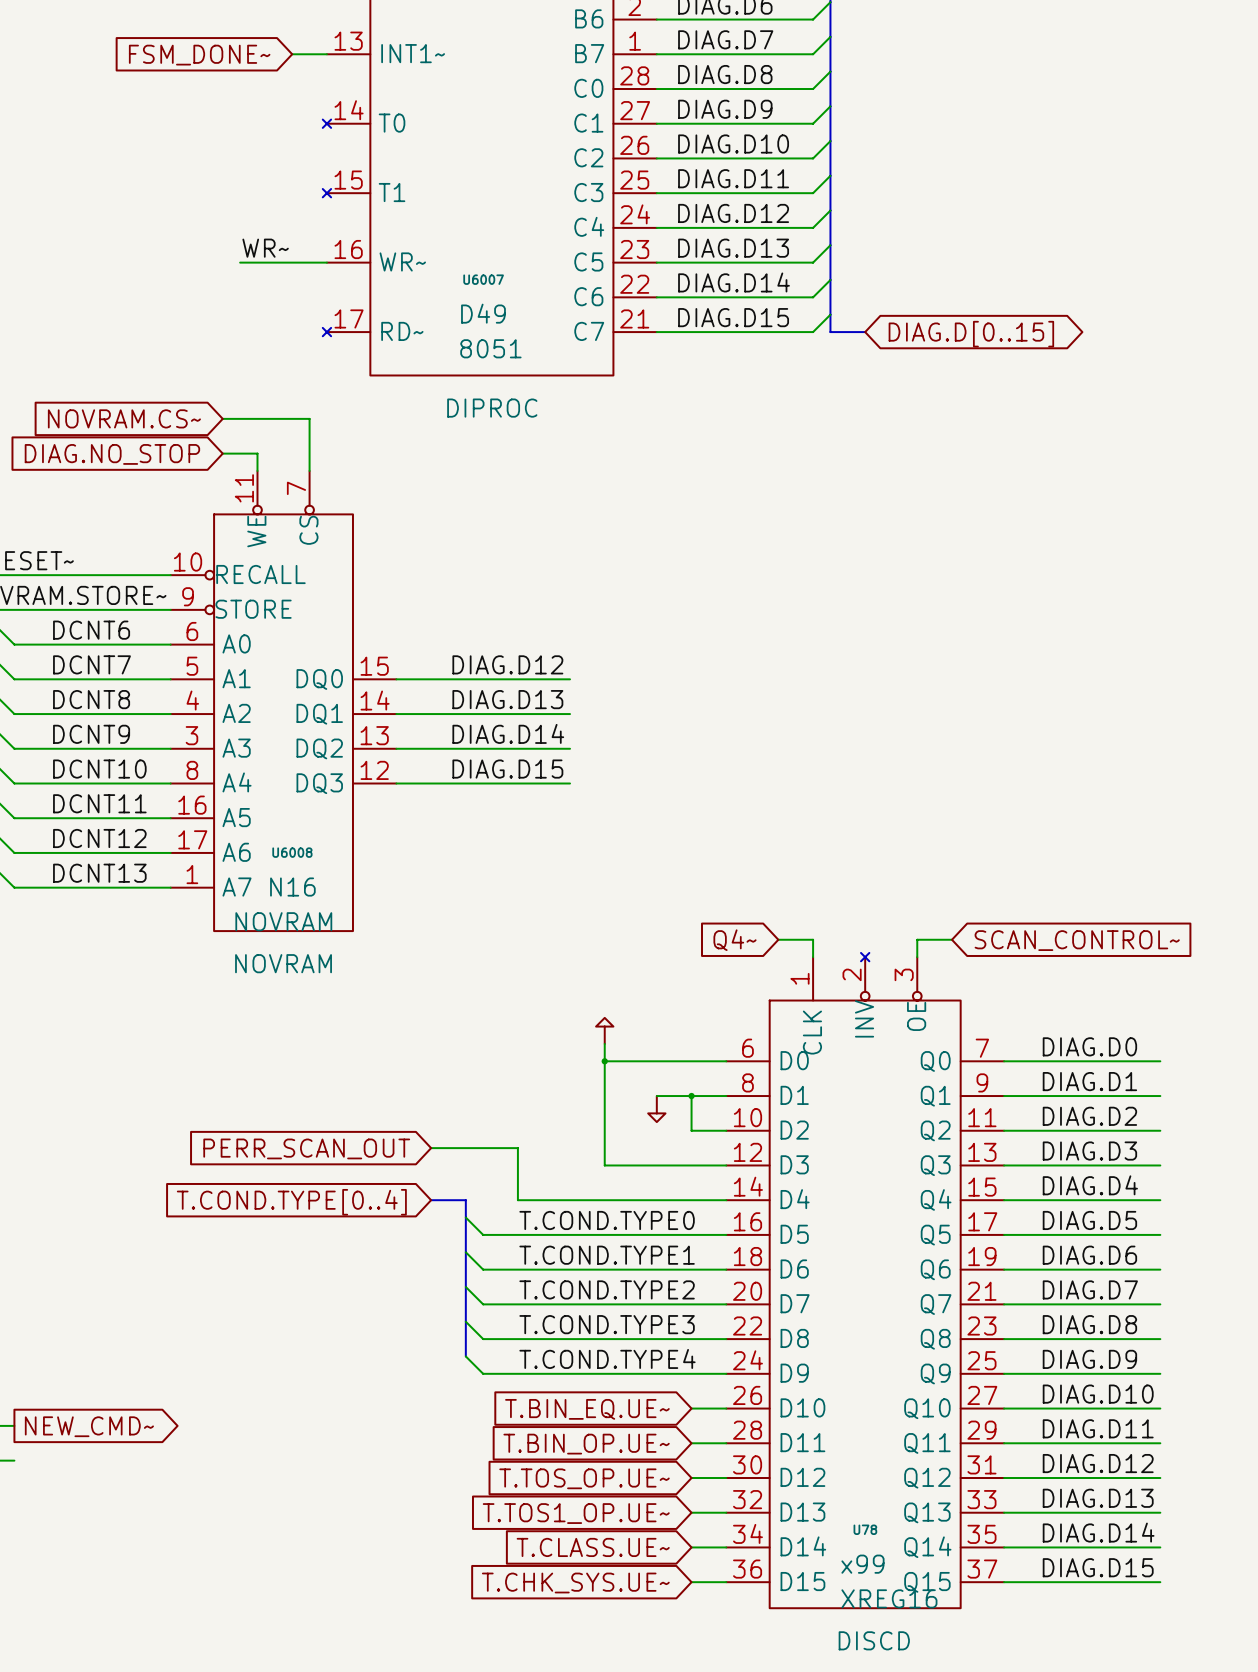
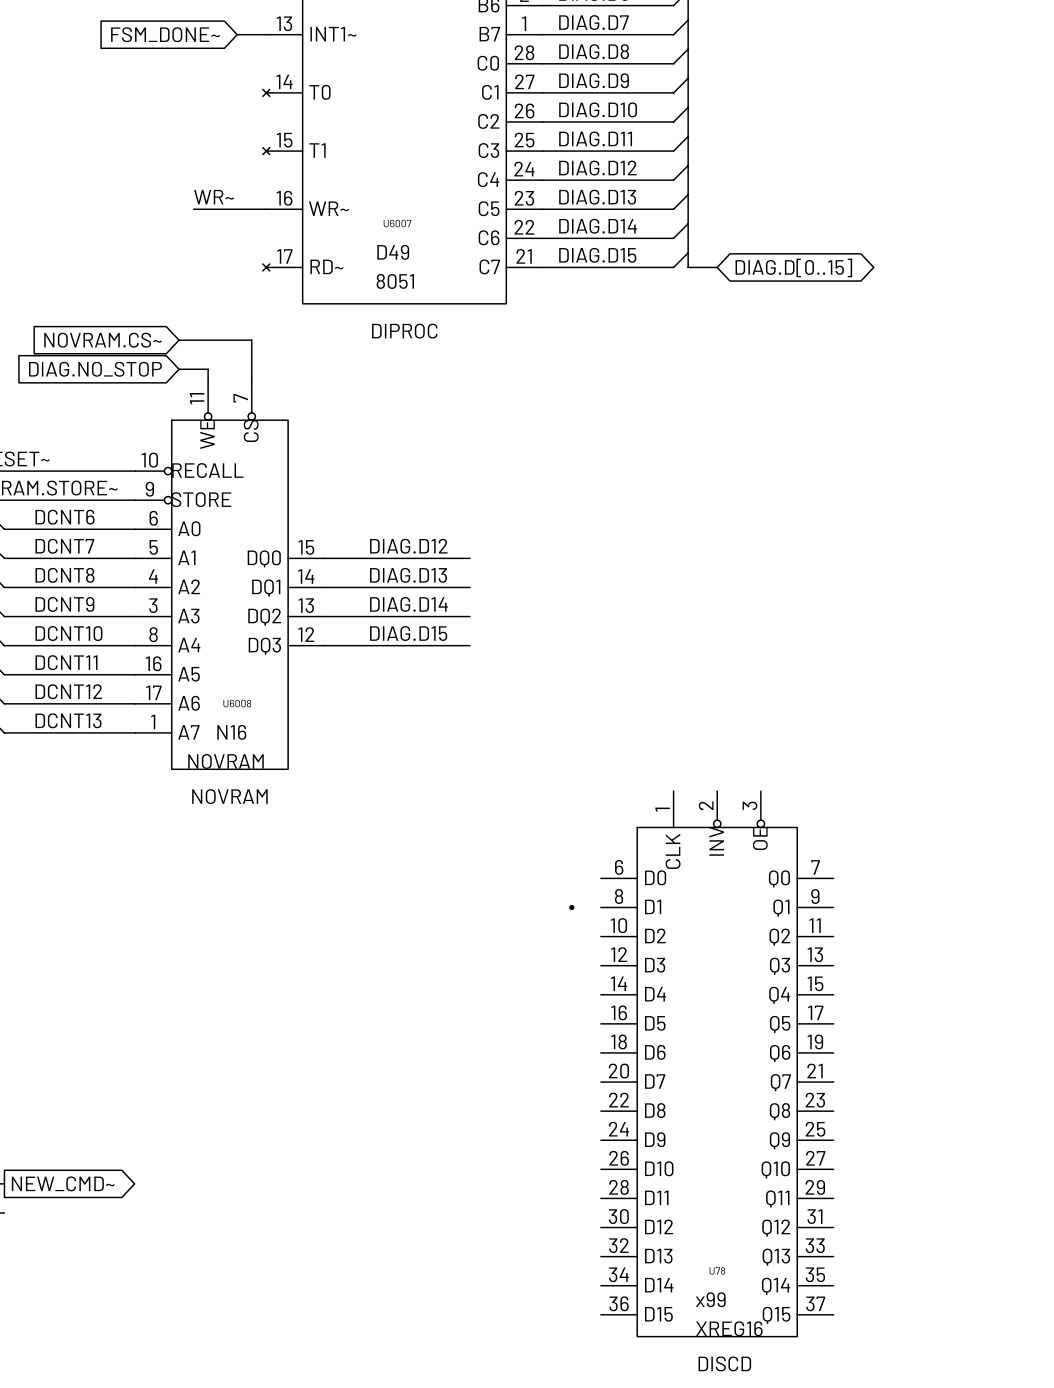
wire: (778, 939) (813, 939) (813, 957) -> none
wire: (951, 939) (917, 939) (917, 957) -> none
global label: Q4~ (734, 940) -> none
global label: SCAN_CONTROL~ (1077, 940) -> none
no-connect mark: (865, 957) -> none
power symbol: (604, 1030) -> none
wire: (604, 1043) (604, 1165) (726, 1165) -> none
label: DIAG.D0 (1089, 1046) -> none
wire: (604, 1061) (726, 1061) -> none
junction: (604, 1061) -> none
wire: (1004, 1061) (1160, 1061) -> none
label: DIAG.D1 (1089, 1081) -> none
wire: (656, 1096) (726, 1096) -> none
wire: (691, 1096) (691, 1130) (726, 1130) -> none
wire: (1004, 1096) (1160, 1096) -> none
power symbol: (656, 1109) -> none
label: DIAG.D2 (1089, 1116) -> none
wire: (1004, 1130) (1160, 1130) -> none
global label: PERR_SCAN_OUT (306, 1148) -> none
wire: (431, 1148) (517, 1148) (517, 1200) (726, 1200) -> none
label: DIAG.D3 (1089, 1151) -> none
wire: (1004, 1165) (1160, 1165) -> none
label: DIAG.D4 (1090, 1185) -> none
bus: (431, 1200) (465, 1200) (465, 1356) -> none
wire: (1004, 1200) (1160, 1200) -> none
global label: T.COND.TYPE[0..4] (291, 1202) -> none
wire: (465, 1217) (483, 1234) (726, 1234) -> none
label: T.COND.TYPE0 (607, 1220) -> none
label: DIAG.D5 (1089, 1220) -> none
wire: (1004, 1234) (1160, 1234) -> none
wire: (465, 1252) (483, 1269) (726, 1269) -> none
label: T.COND.TYPE1 (607, 1255) -> none
label: DIAG.D6 (1089, 1255) -> none
wire: (1004, 1269) (1160, 1269) -> none
wire: (465, 1287) (483, 1304) (726, 1304) -> none
label: T.COND.TYPE2 (607, 1289) -> none
label: DIAG.D7 (1090, 1289) -> none
wire: (1004, 1304) (1160, 1304) -> none
wire: (465, 1321) (483, 1339) (726, 1339) -> none
label: T.COND.TYPE3 (607, 1324) -> none
label: DIAG.D8 (1089, 1324) -> none
wire: (1004, 1339) (1160, 1339) -> none
wire: (465, 1356) (483, 1373) (726, 1373) -> none
label: T.COND.TYPE4 (607, 1358) -> none
label: DIAG.D9 (1089, 1359) -> none
wire: (1004, 1373) (1160, 1373) -> none
label: DIAG.D10 (1098, 1394) -> none
wire: (691, 1408) (726, 1408) -> none
wire: (1004, 1408) (1160, 1408) -> none
global label: T.BIN_EQ.UE~ (587, 1409) -> none
label: DIAG.D11 (1098, 1428) -> none
wire: (691, 1443) (726, 1443) -> none
wire: (1004, 1443) (1160, 1443) -> none
global label: T.BIN_OP.UE~ (586, 1444) -> none
label: DIAG.D12 (1098, 1463) -> none
global label: T.TOS_OP.UE~ (584, 1478) -> none
wire: (691, 1478) (726, 1478) -> none
wire: (1004, 1478) (1160, 1478) -> none
label: DIAG.D13 (1098, 1498) -> none
wire: (691, 1512) (726, 1512) -> none
wire: (1004, 1512) (1160, 1512) -> none
global label: T.TOS1_OP.UE~ (576, 1513) -> none
label: DIAG.D14 (1098, 1532) -> none
global label: T.CLASS.UE~ (593, 1547) -> none
wire: (691, 1547) (726, 1547) -> none
wire: (1004, 1547) (1160, 1547) -> none
label: DIAG.D15 (1098, 1567) -> none
wire: (691, 1582) (726, 1582) -> none
wire: (1004, 1582) (1160, 1582) -> none
global label: T.CHK_SYS.UE~ (575, 1583) -> none

